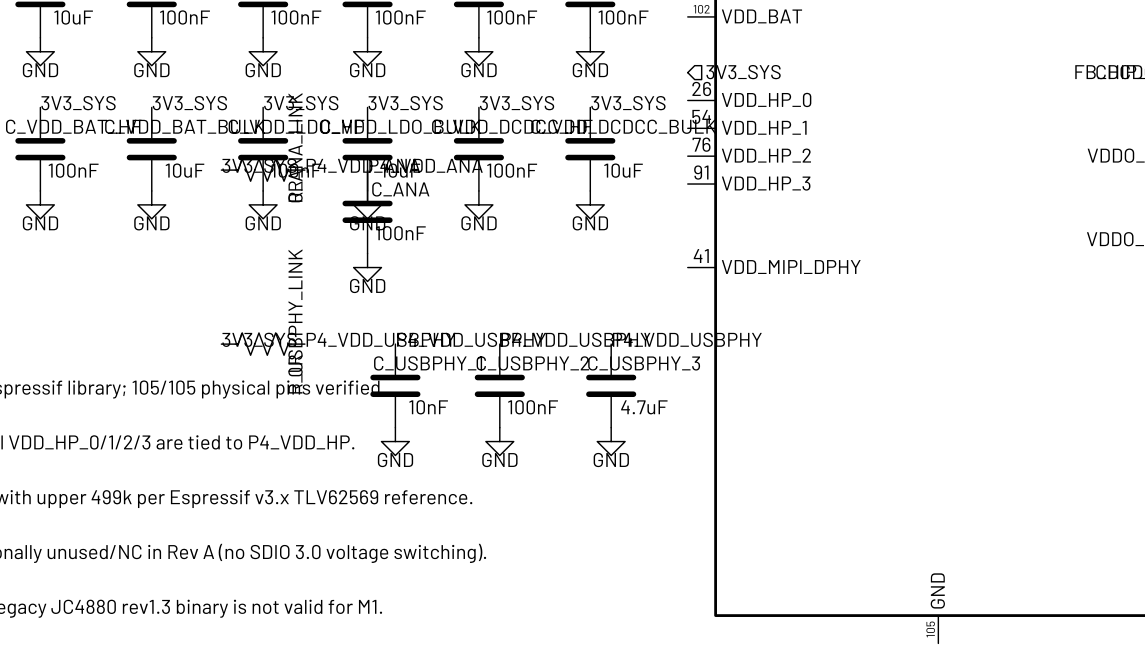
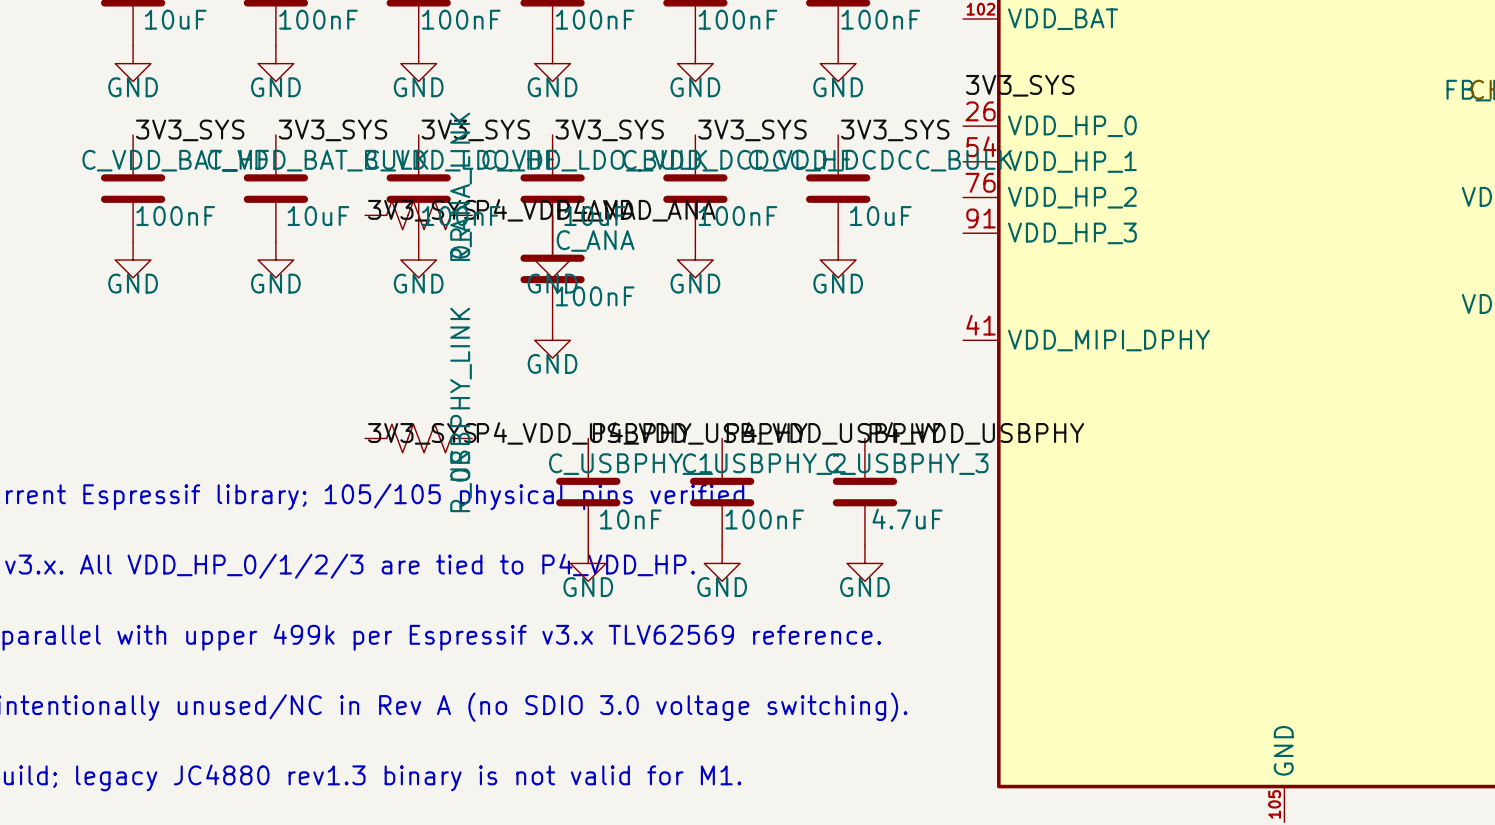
label: none -> 3V3_SYS (1020, 85)
hierarchical label: 3V3_SYS (743, 72) -> none

